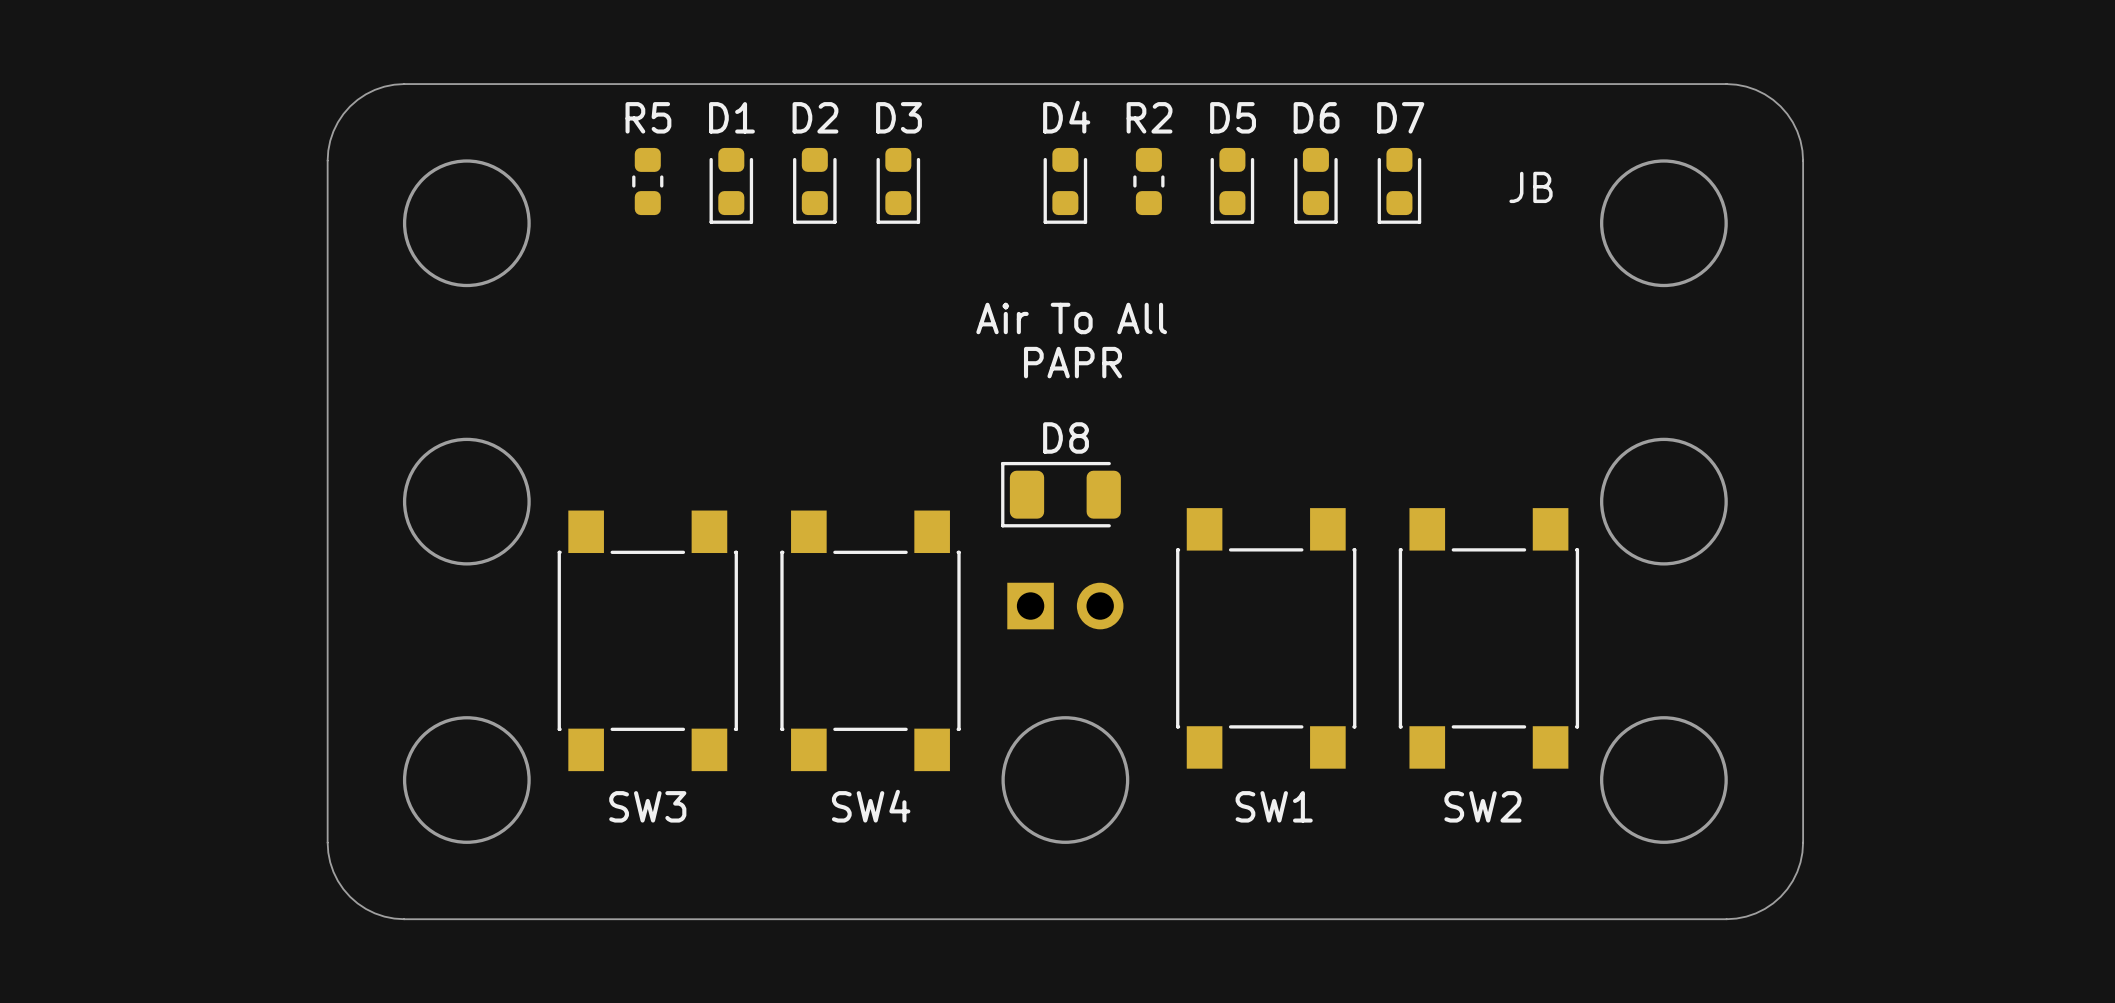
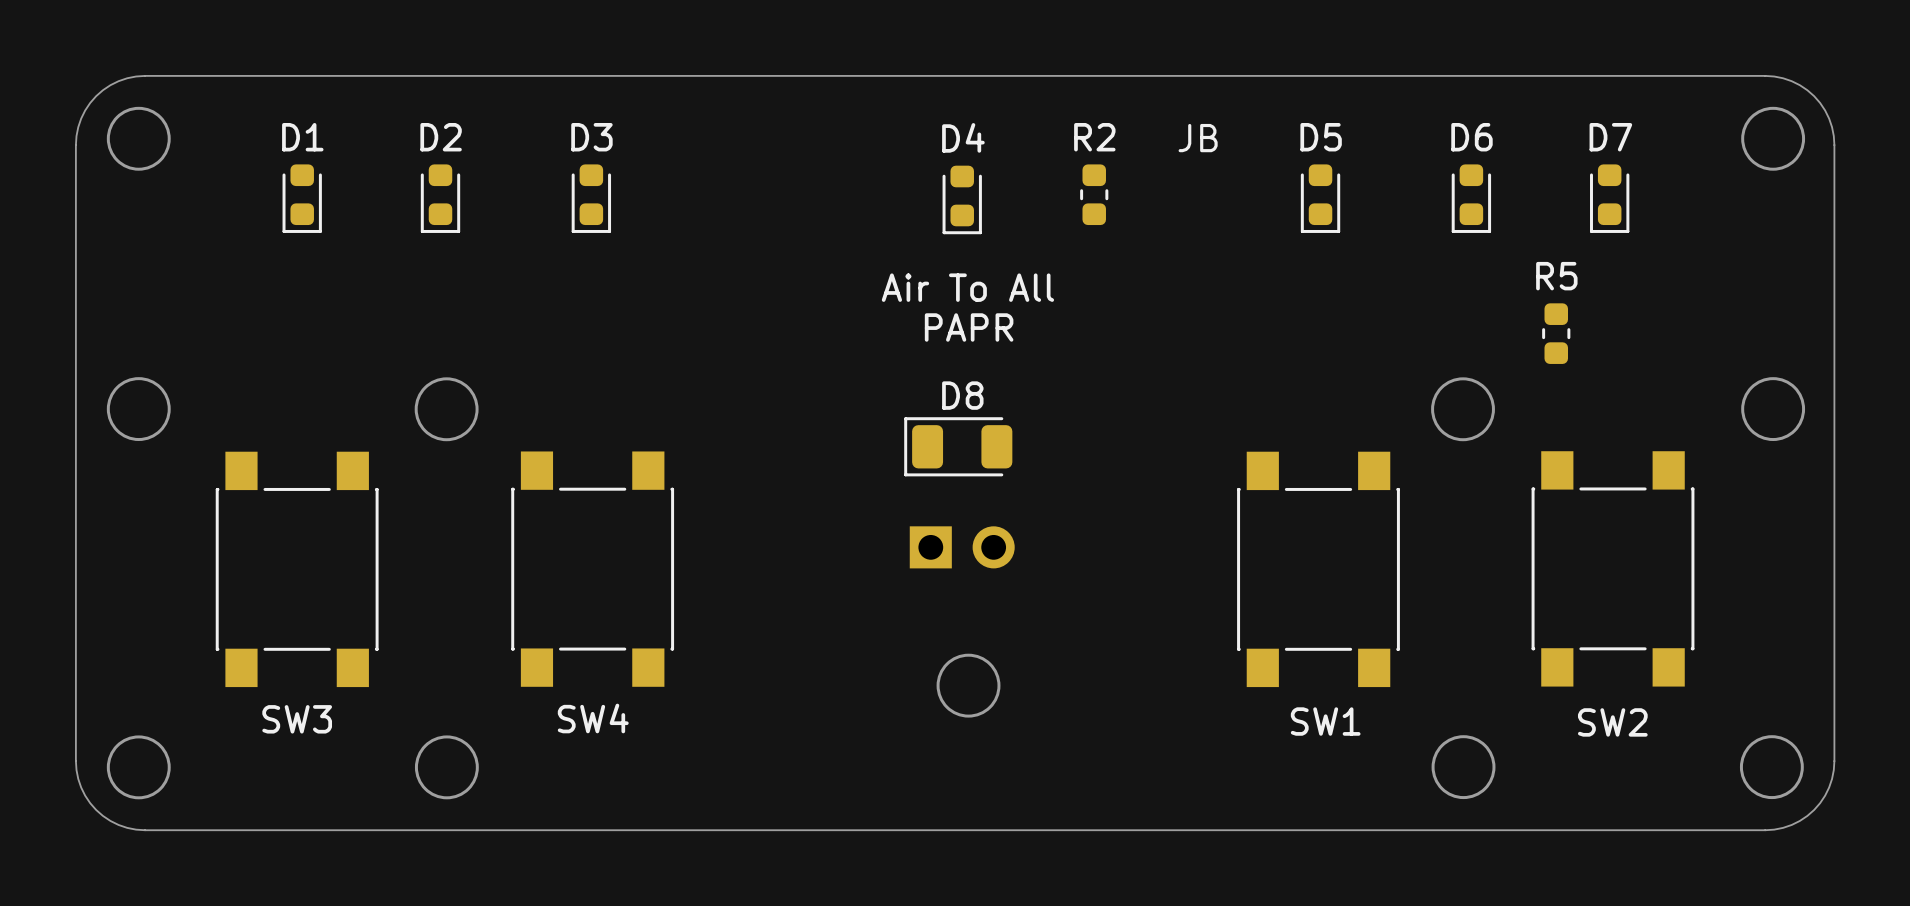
board edge: (404, 84) (374, 89) (350, 106) (333, 131) (327, 160) (328, 852) (337, 880) (357, 903) (374, 913) (404, 919) -> (365, 75) (145, 75) (127, 78) (102, 90) (90, 102) (81, 118) (75, 145) (75, 761) (81, 787) (90, 803) (102, 815) (118, 824) (136, 829) (365, 830)
board edge: (1726, 84) (1755, 89) (1780, 106) (1797, 131) (1803, 160) (1802, 852) (1792, 880) (1773, 903) (1755, 913) (1726, 919) -> (1559, 75) (1765, 75) (1783, 78) (1799, 85) (1820, 102) (1829, 118) (1834, 145) (1834, 761) (1829, 787) (1820, 803) (1807, 815) (1791, 824) (1774, 829) (1559, 830)
round board edge: none -> [106, 106, 171, 171]
round board edge: none -> [1741, 106, 1806, 171]
round board edge: [402, 159, 531, 288] -> none
round board edge: [1600, 159, 1728, 288] -> none
R5 position: (647, 181) -> (1556, 333)
R2 position: (1148, 181) -> (1094, 194)
D1 position: (731, 185) -> (302, 198)
D2 position: (814, 185) -> (440, 198)
D3 position: (898, 185) -> (591, 198)
D4 position: (1065, 185) -> (962, 199)
D5 position: (1232, 185) -> (1320, 198)
D6 position: (1315, 185) -> (1471, 198)
D7 position: (1399, 185) -> (1609, 198)
text position: JB (1531, 187) -> JB (1198, 138)
round board edge: none -> [106, 377, 171, 442]
round board edge: none -> [414, 377, 479, 442]
round board edge: none -> [1431, 377, 1495, 442]
round board edge: none -> [1741, 377, 1806, 442]
round board edge: [402, 437, 531, 566] -> none
round board edge: [1600, 437, 1728, 566] -> none
SW1 position: (1266, 638) -> (1318, 569)
SW2 position: (1488, 638) -> (1613, 568)
SW3 position: (647, 640) -> (297, 569)
SW4 position: (870, 640) -> (592, 569)
round board edge: [402, 716, 531, 844] -> none
round board edge size: [1001, 716, 1130, 844] -> [936, 653, 1001, 718]
round board edge: [1600, 716, 1728, 844] -> none
SW2 name position: SW2 (1482, 806) -> SW2 (1612, 722)
round board edge: none -> [1431, 735, 1496, 800]
round board edge: none -> [1739, 735, 1804, 800]
round board edge: none -> [106, 735, 171, 800]
round board edge: none -> [414, 735, 479, 800]

